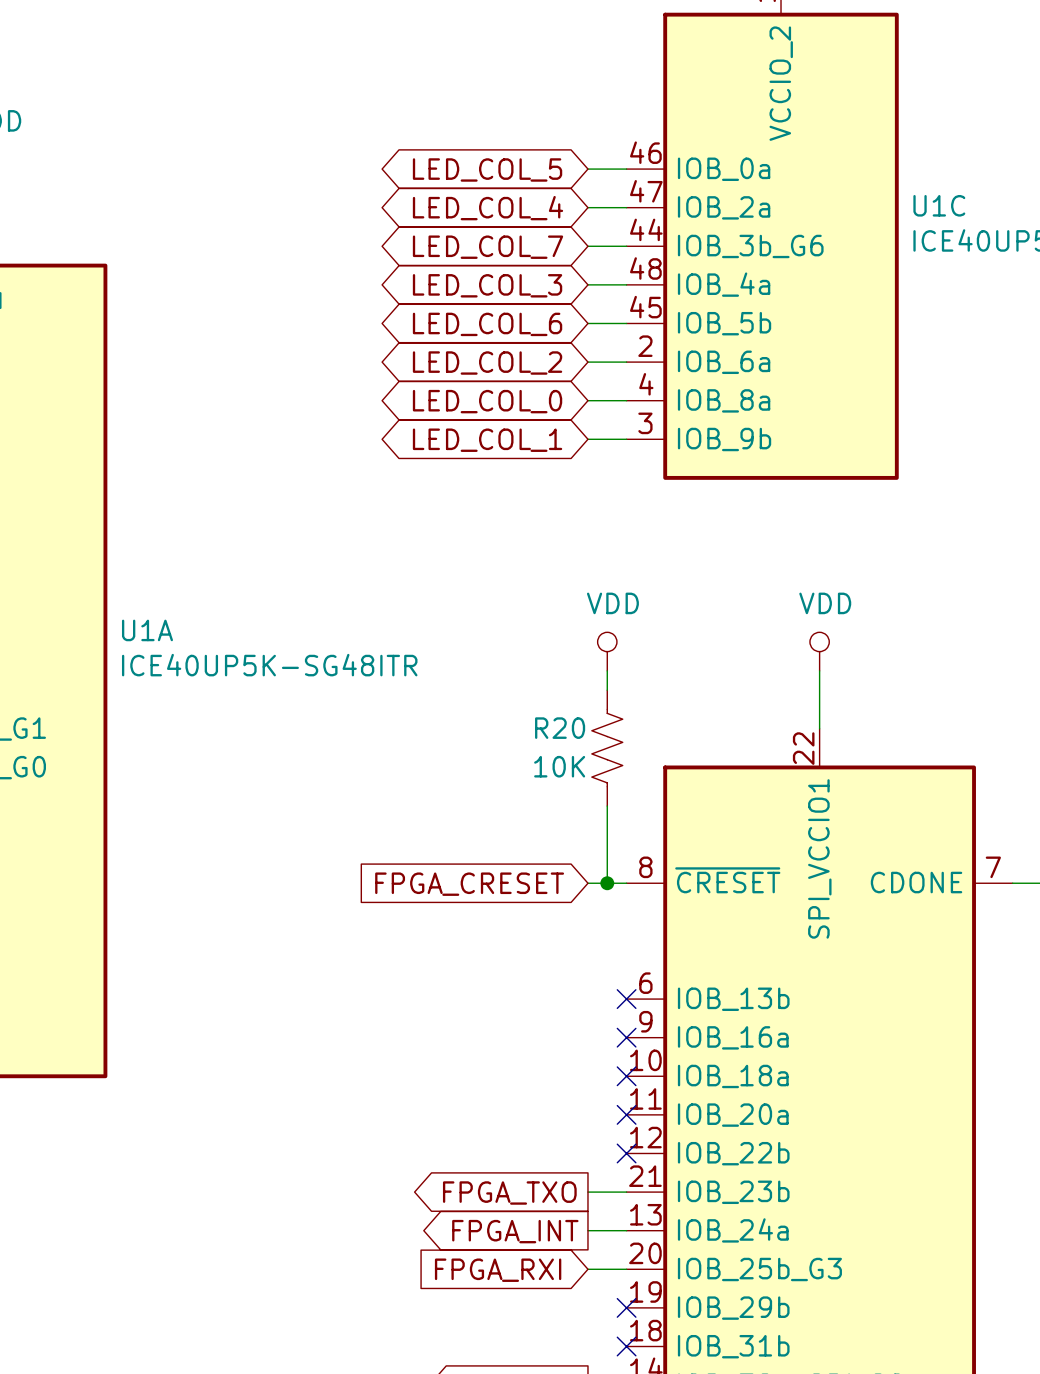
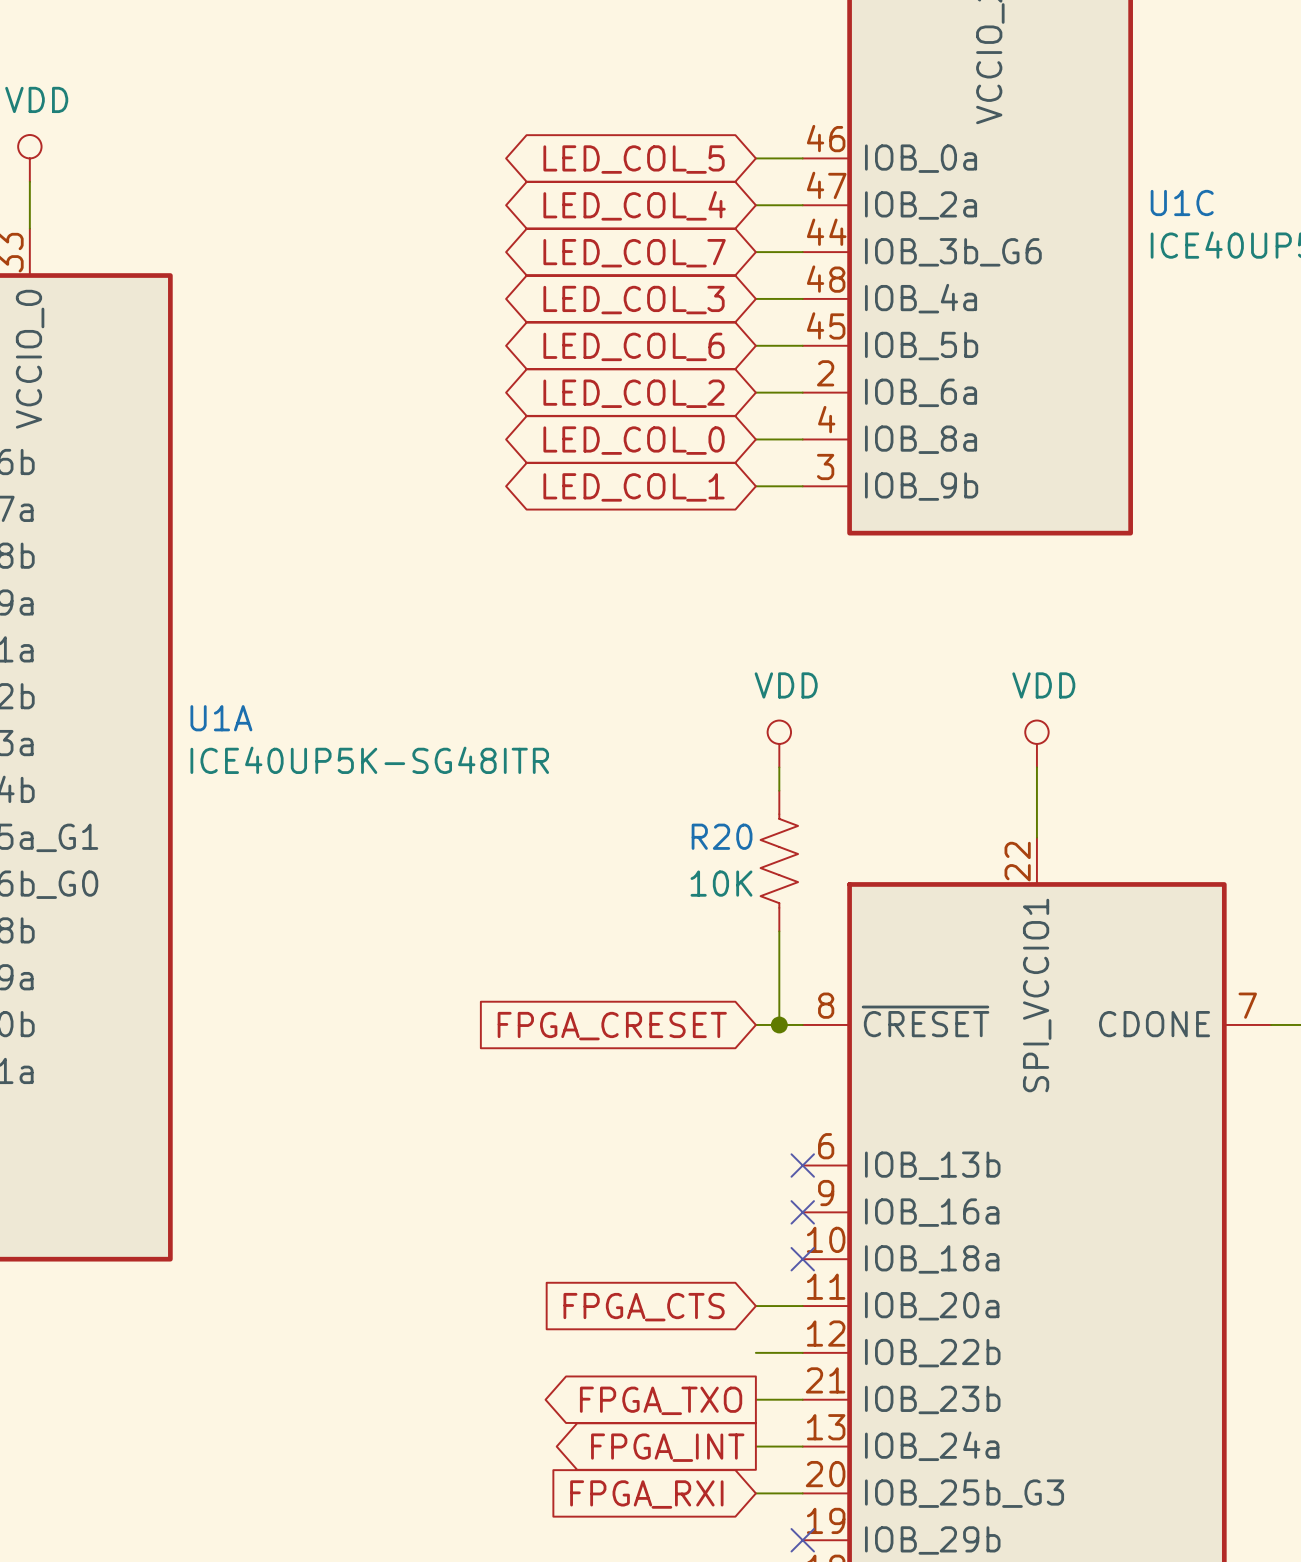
wire: none -> (755, 1306) (802, 1306)
no-connect mark: (626, 1114) -> none
global label: none -> FPGA_CTS (644, 1307)
wire: none -> (755, 1352) (802, 1352)
no-connect mark: (626, 1153) -> none

